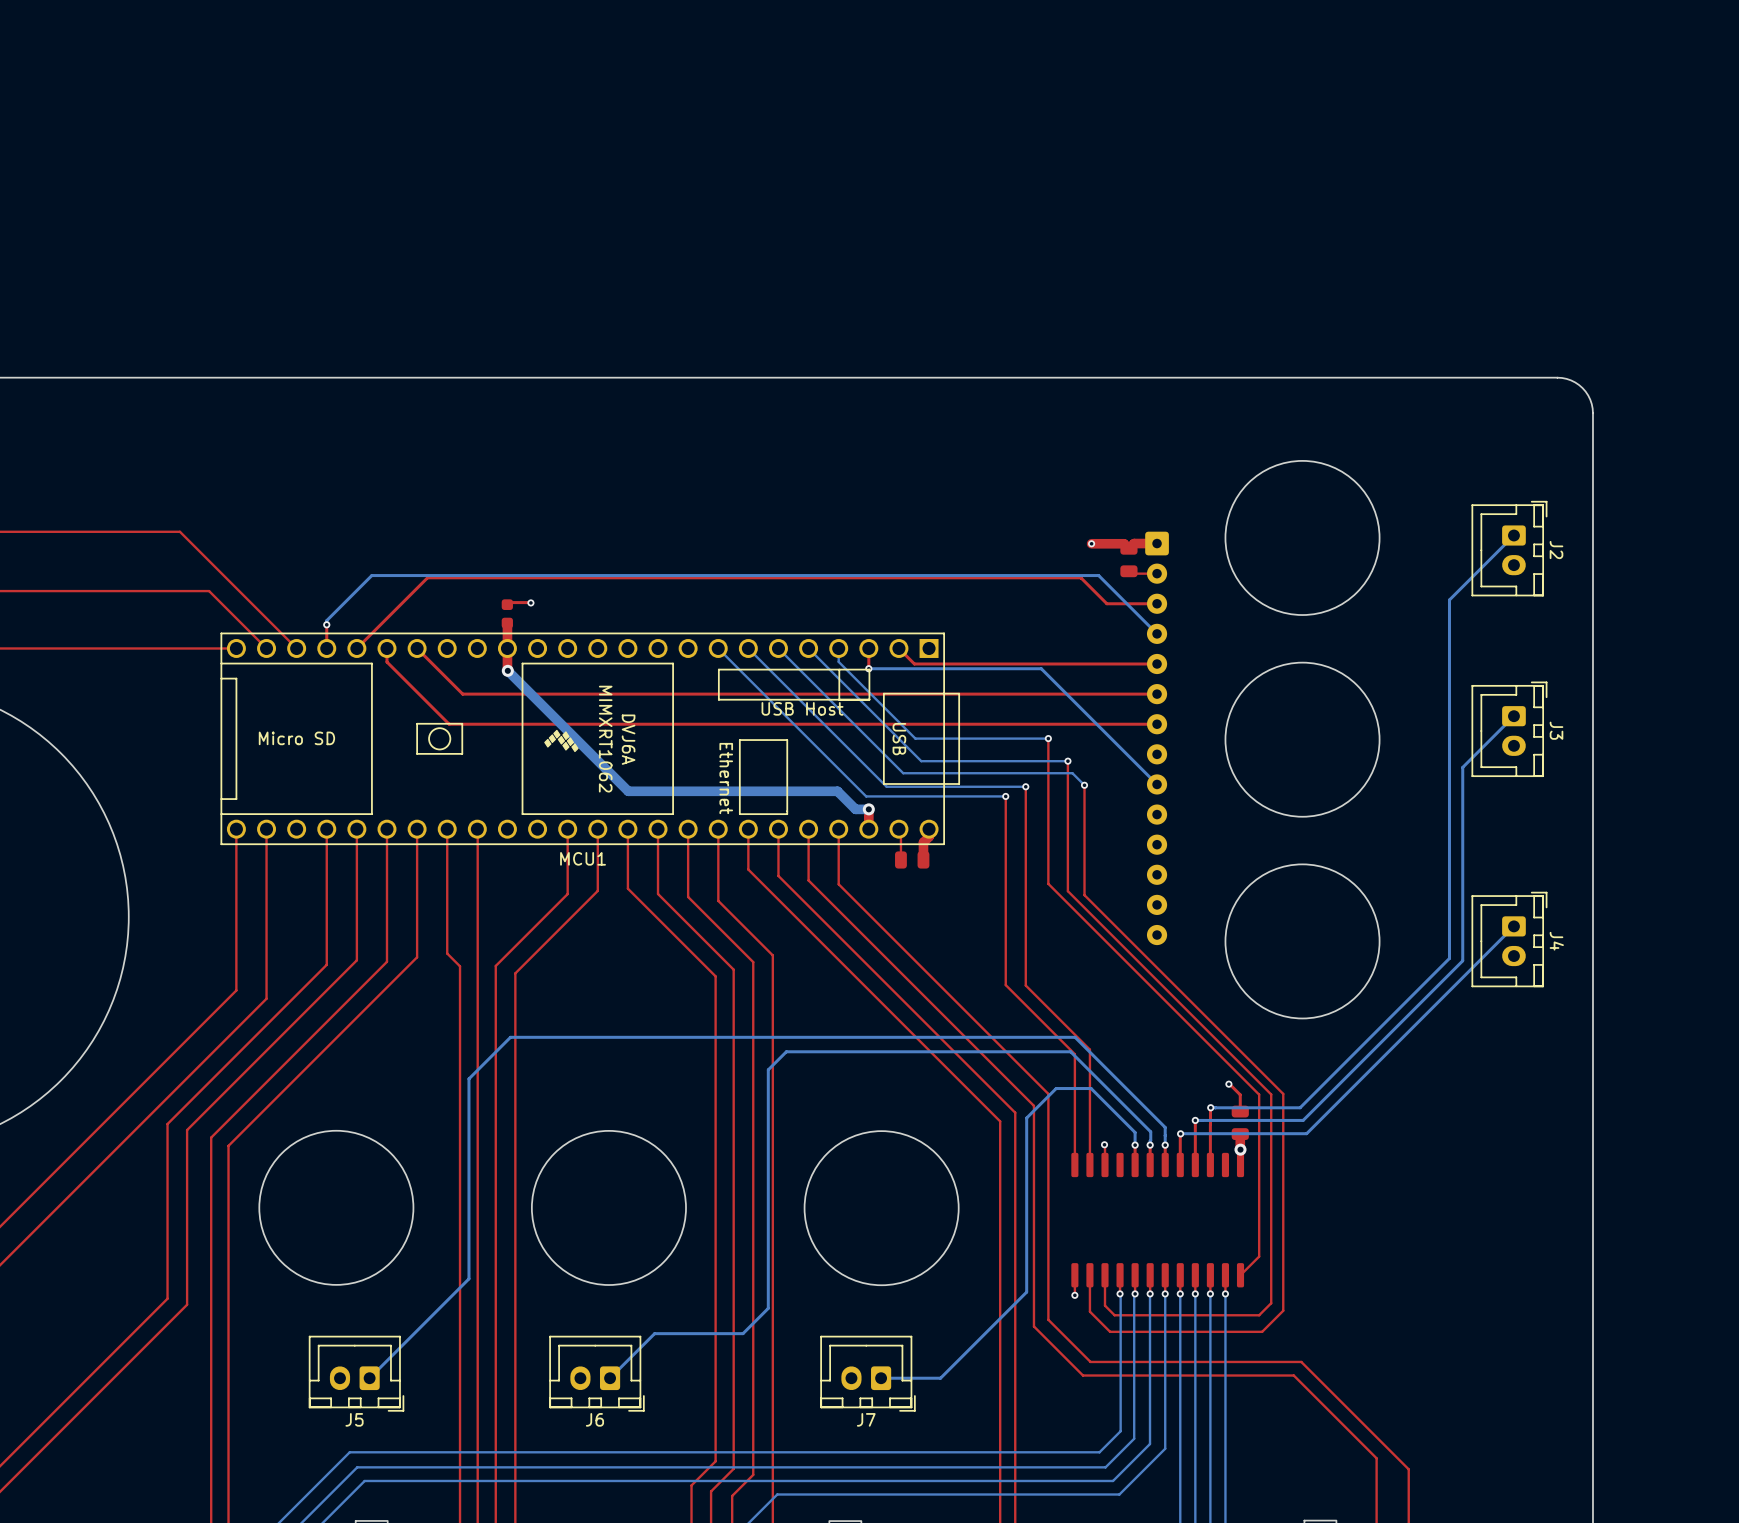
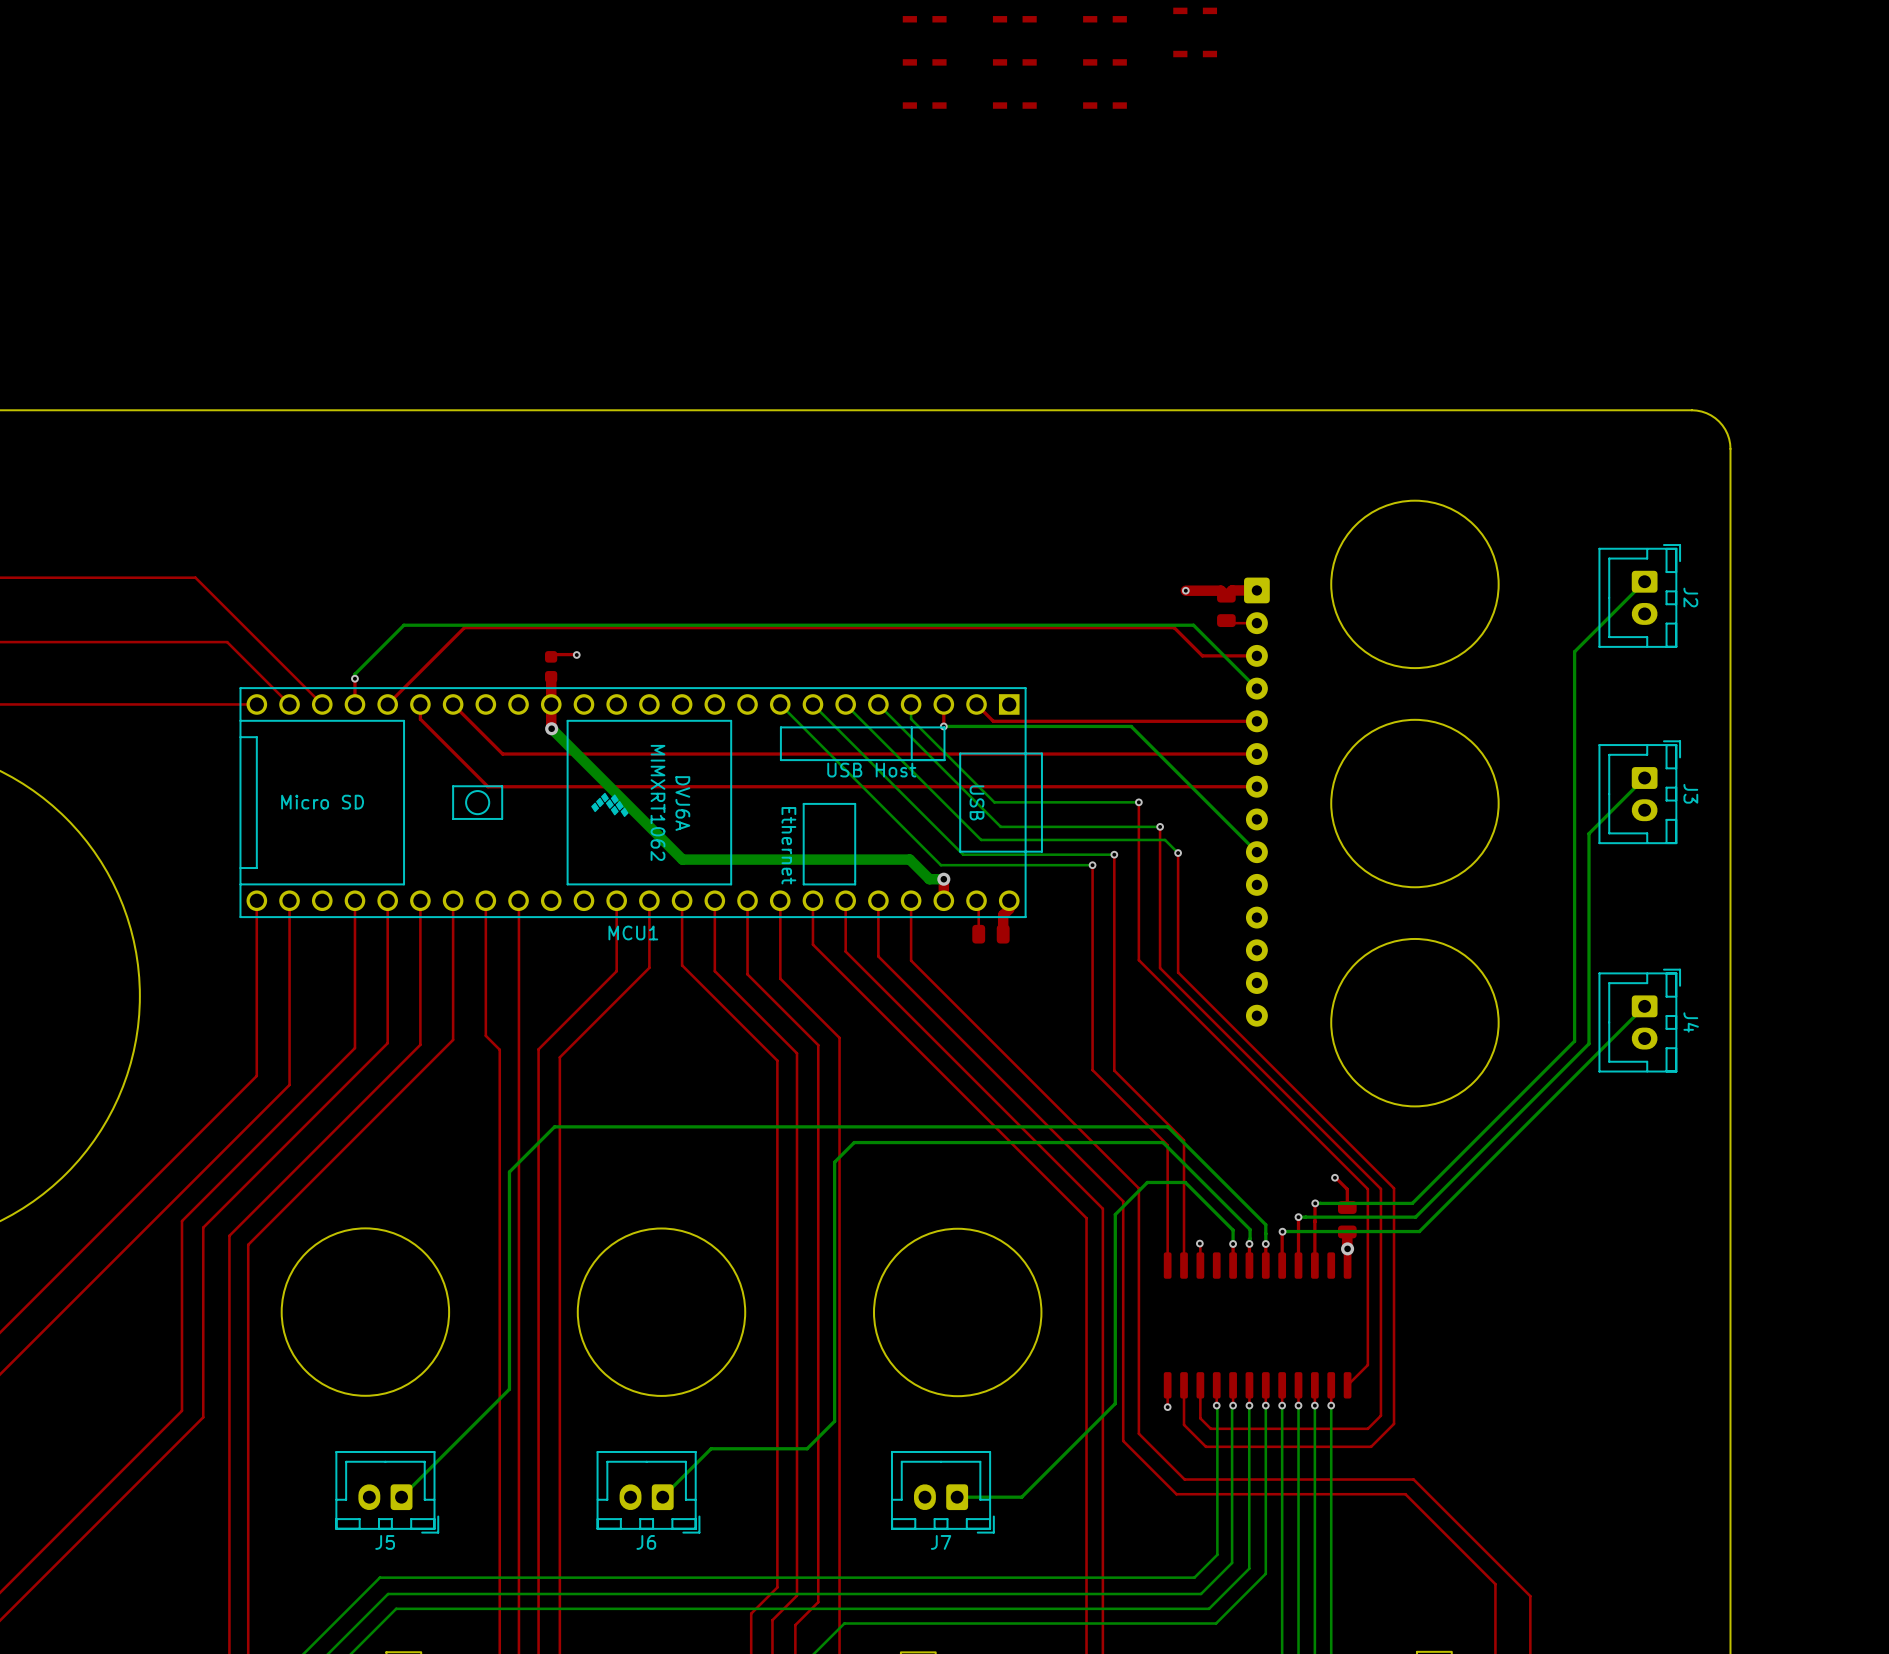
part: none -> (1195, 10)
part: none -> (924, 19)
part: none -> (1014, 19)
part: none -> (1104, 19)
part: none -> (1195, 54)
part: none -> (924, 62)
part: none -> (1014, 62)
part: none -> (1104, 62)
part: none -> (924, 105)
part: none -> (1014, 105)
part: none -> (1104, 105)

